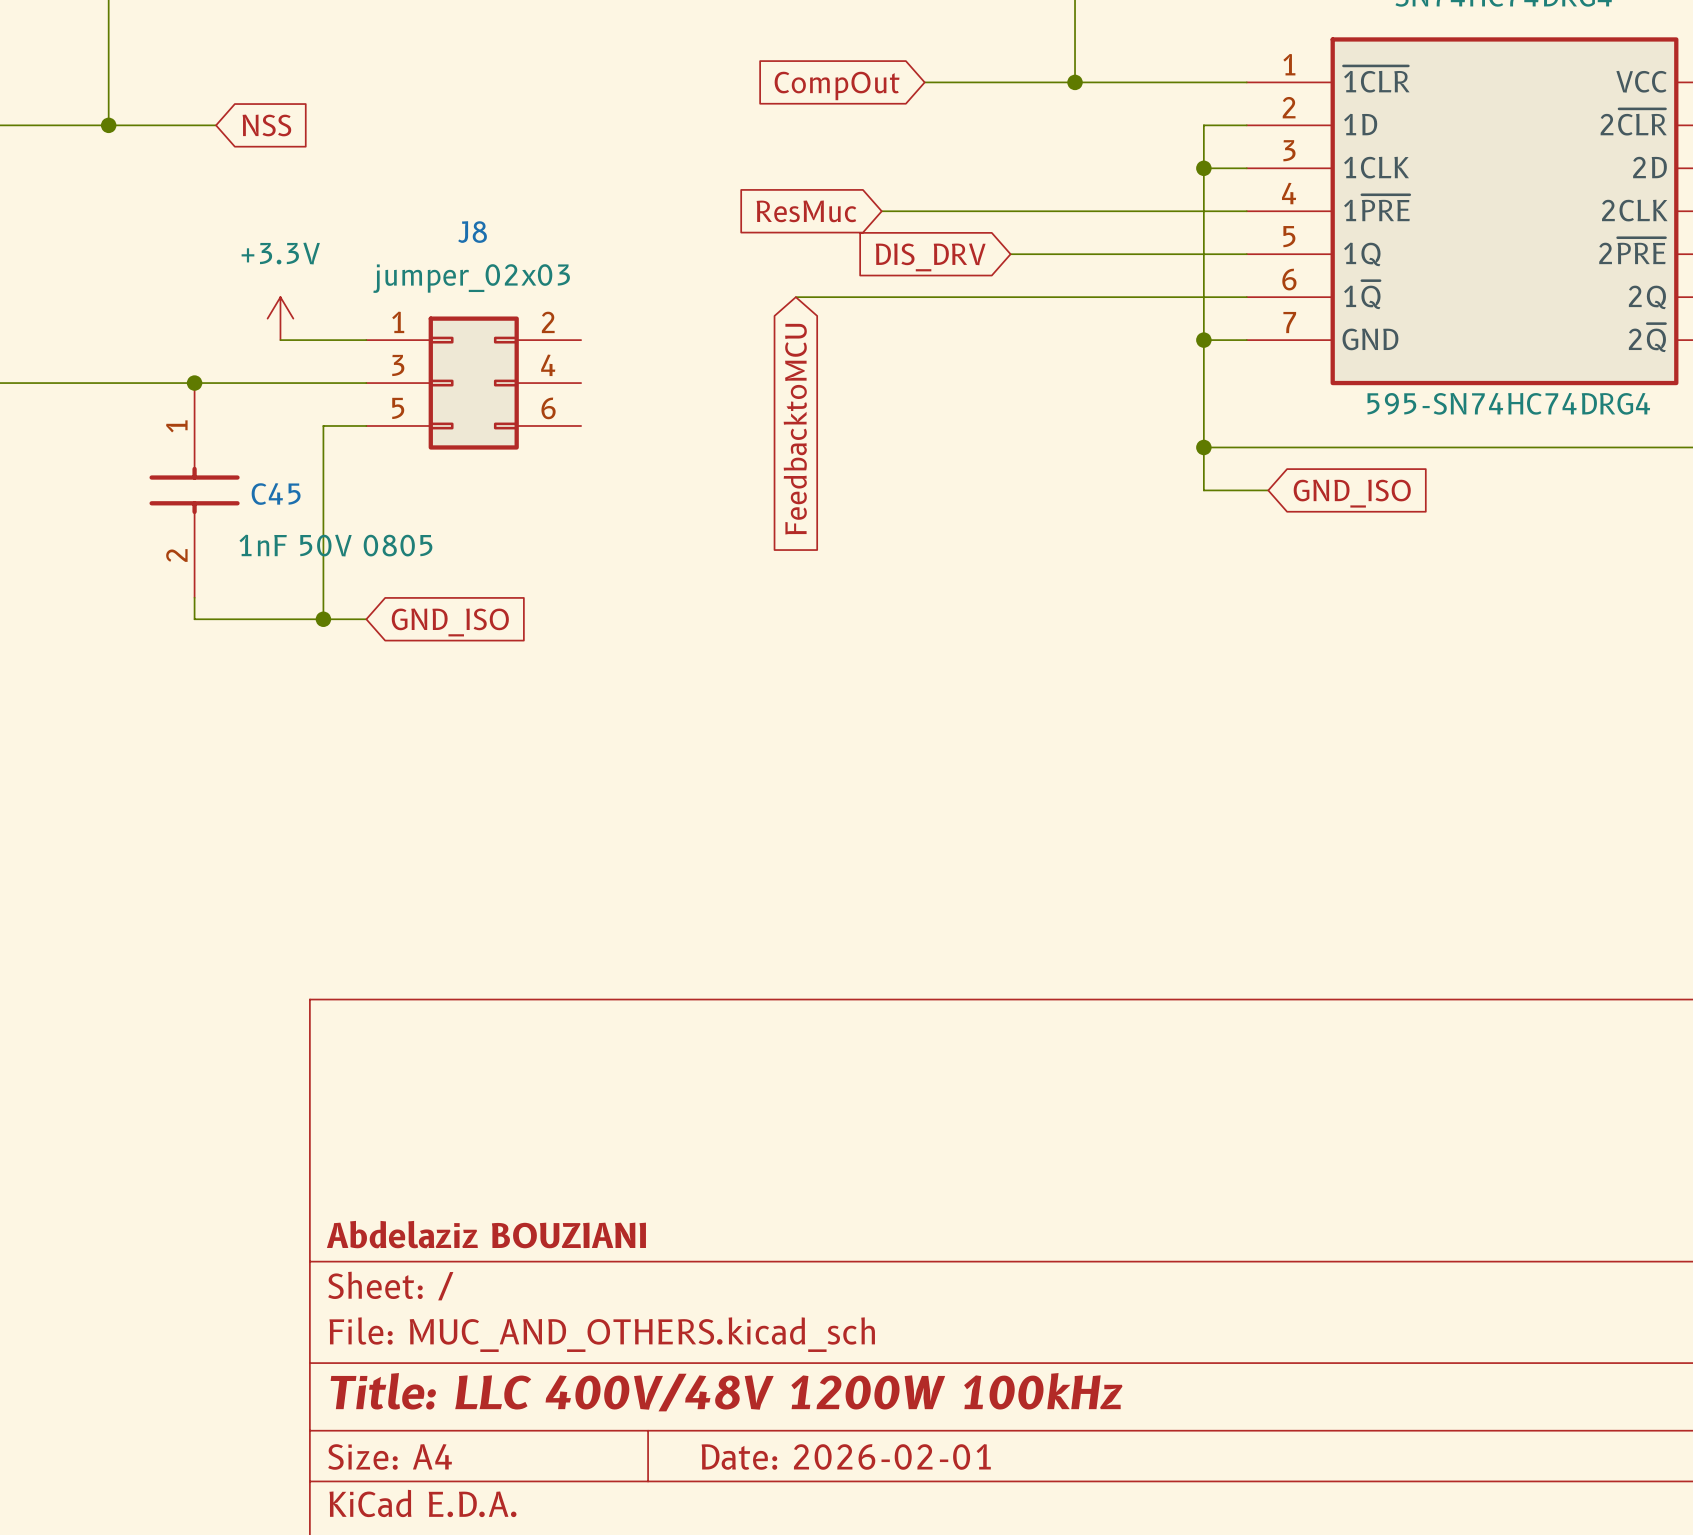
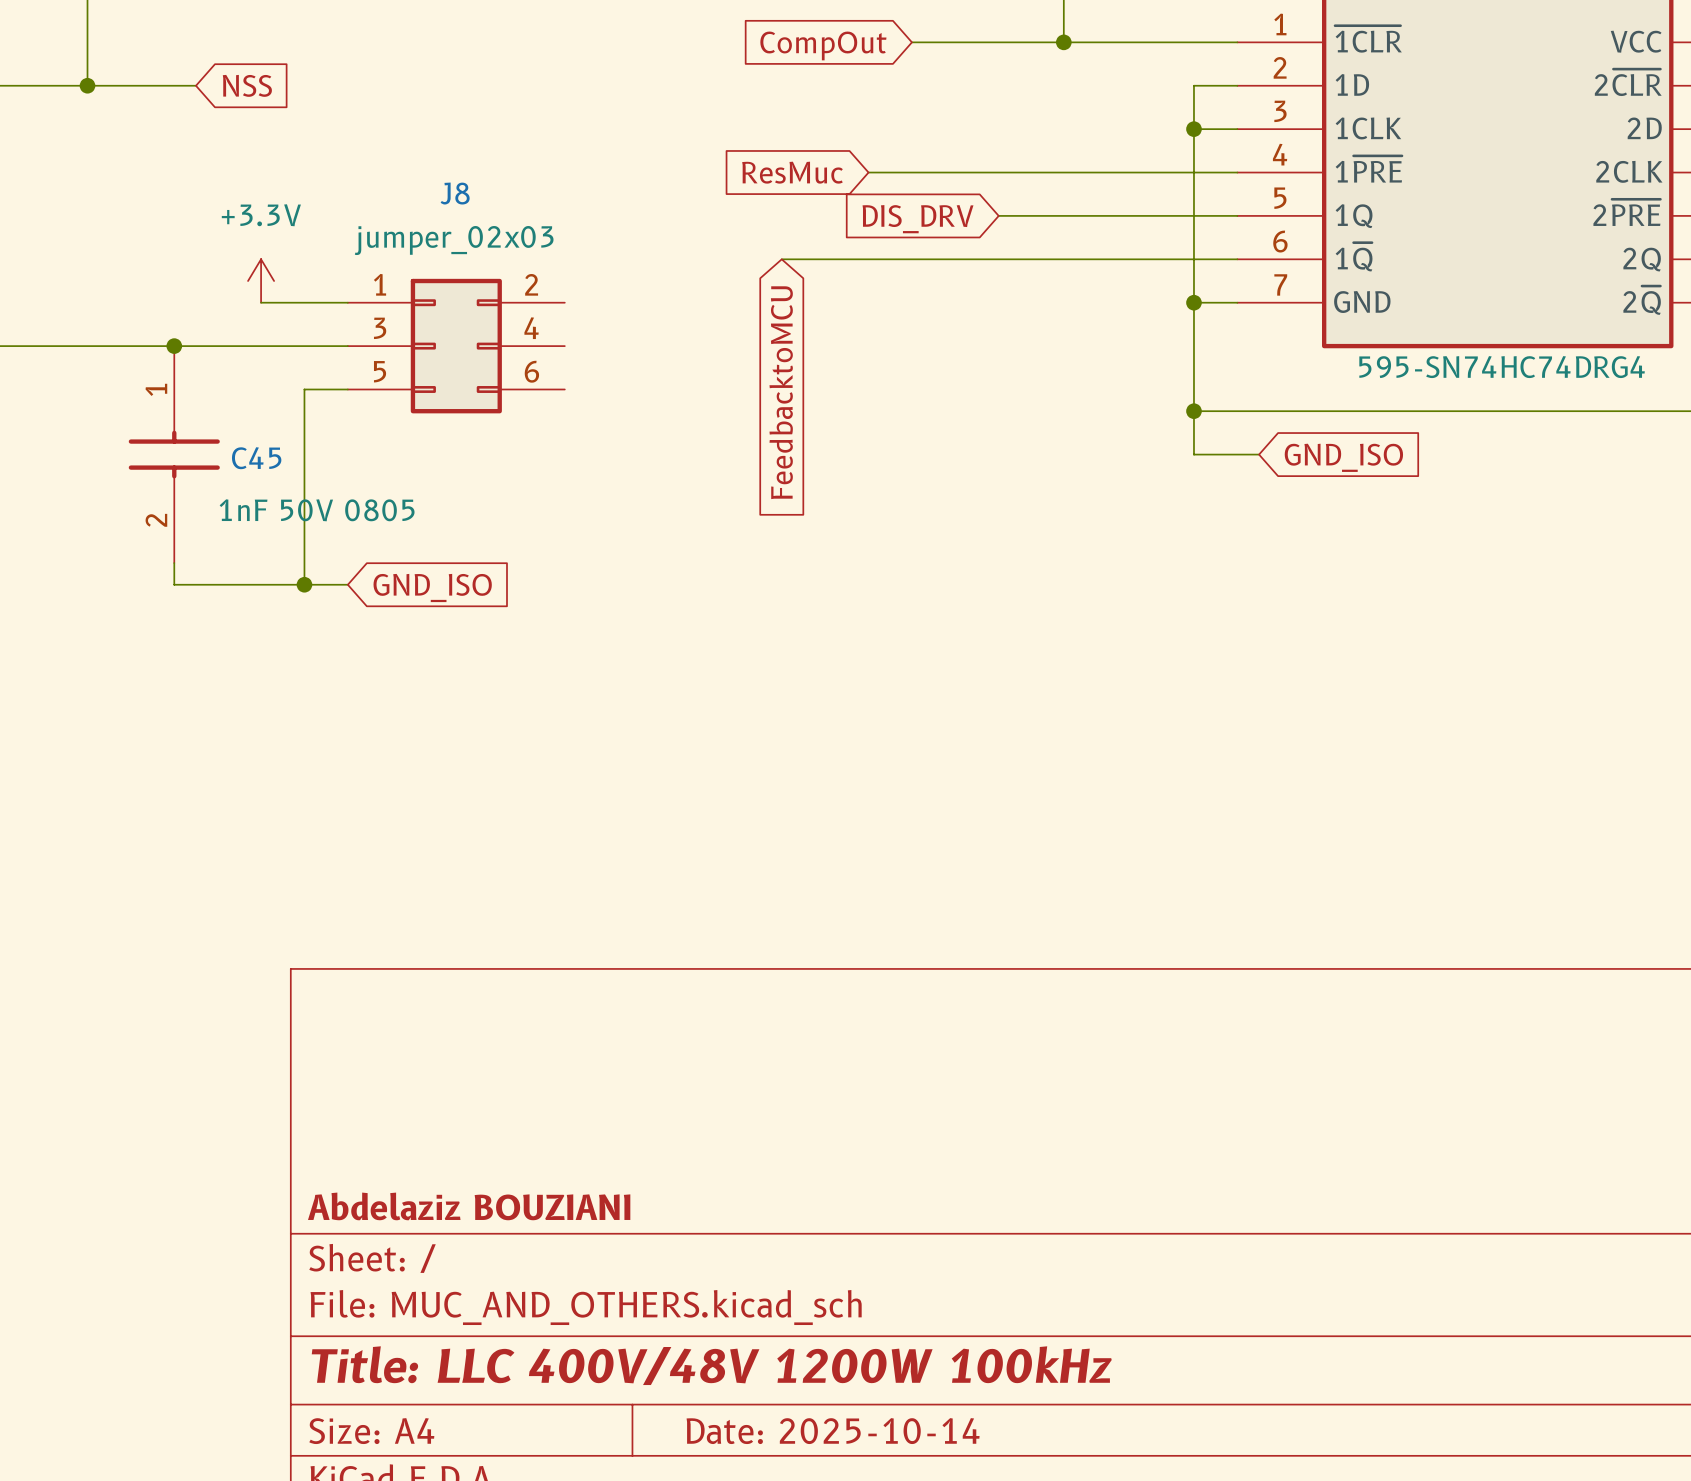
title block: Date: 2026-02-01 (846, 1456) -> Date: 2025-10-14 (833, 1431)

